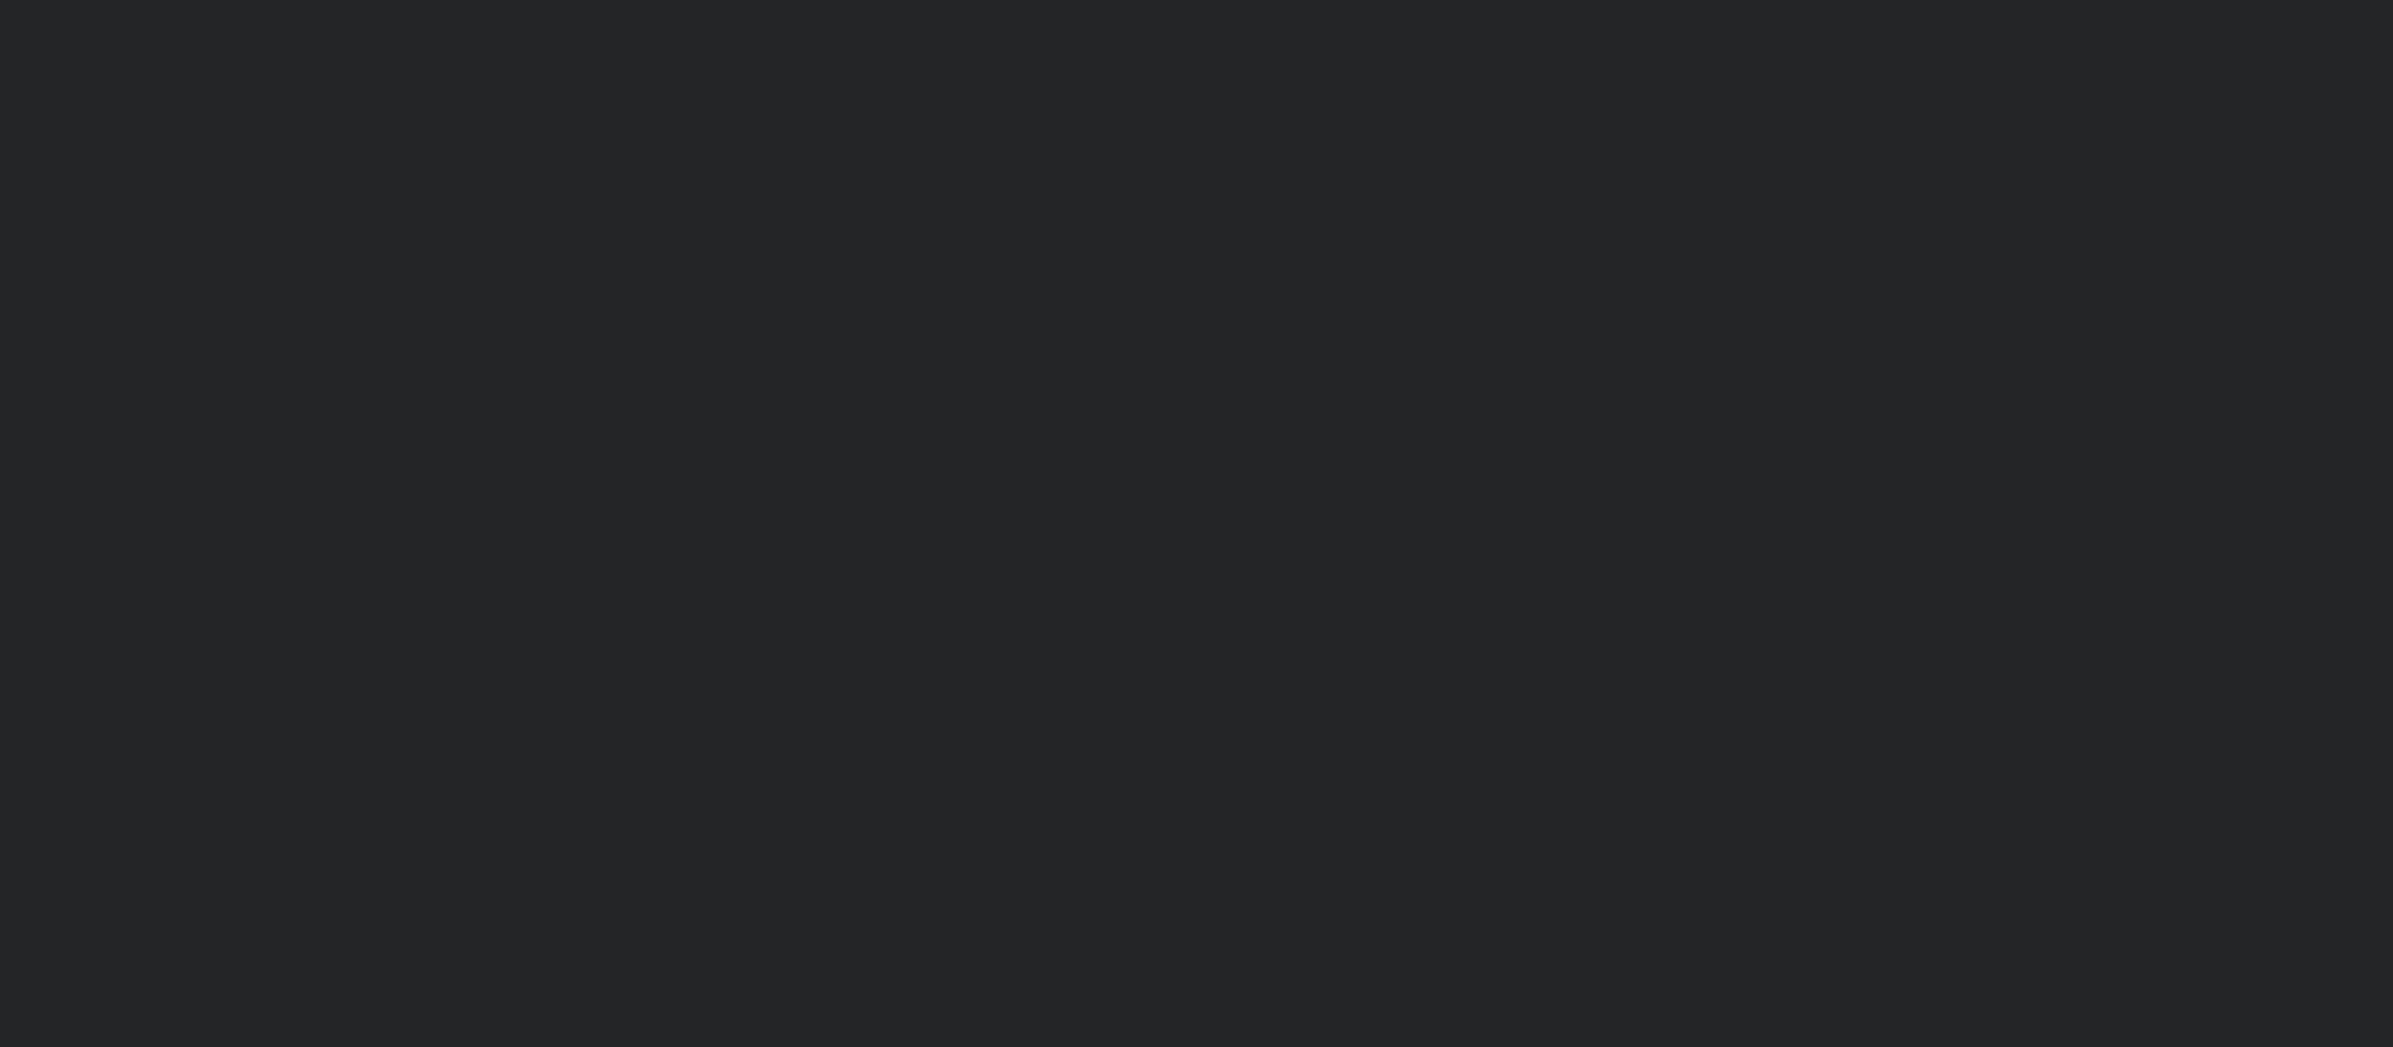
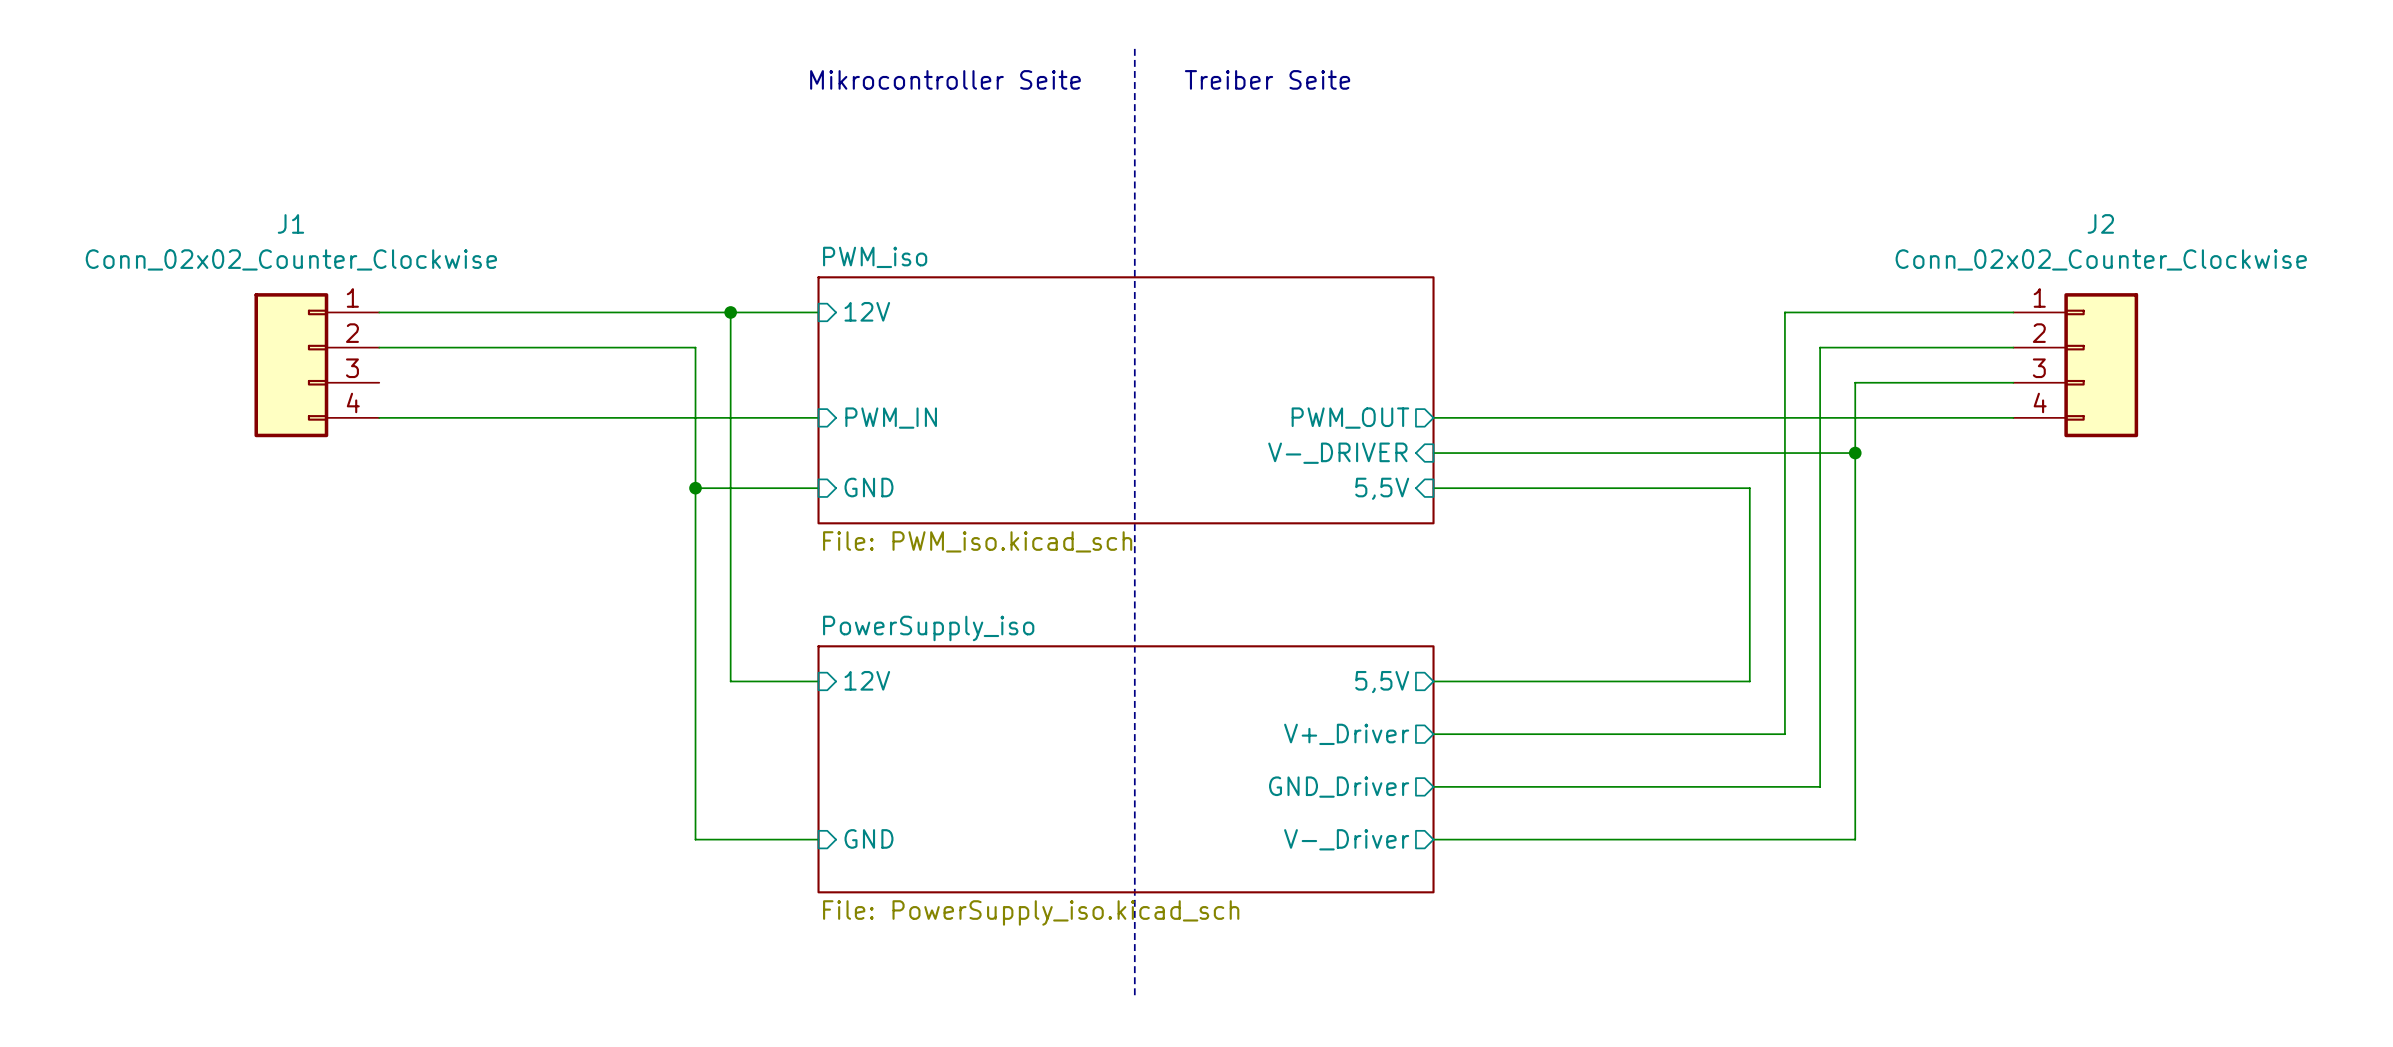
line: none -> (1134, 48) (1134, 997)
text: none -> Mikrocontroller Seite (945, 79)
text: none -> Treiber Seite (1267, 79)
sheet pin: none -> 12V (867, 311)
wire: none -> (379, 312) (818, 312)
wire: none -> (730, 312) (730, 681) (818, 681)
junction: none -> (730, 312)
wire: none -> (2013, 312) (1784, 312) (1784, 734) (1433, 734)
wire: none -> (379, 347) (695, 347) (695, 839) (818, 839)
wire: none -> (2013, 347) (1820, 347) (1820, 786) (1433, 786)
J1: none -> Conn_02x02_Counter_Clockwise (316, 365)
J2: none -> Conn_02x02_Counter_Clockwise (2075, 365)
wire: none -> (2013, 382) (1855, 382) (1855, 839) (1433, 839)
sheet PWM_iso: none -> File: PWM_iso.kicad_sch (1126, 400)
wire: none -> (379, 417) (818, 417)
sheet pin: none -> PWM_IN (891, 418)
sheet pin: none -> PWM_OUT (1350, 418)
wire: none -> (1433, 417) (2013, 417)
sheet pin: none -> V-_DRIVER (1337, 453)
wire: none -> (1433, 453) (1855, 453)
junction: none -> (1855, 453)
sheet pin: none -> GND (869, 487)
wire: none -> (695, 488) (818, 488)
junction: none -> (695, 488)
sheet pin: none -> 5,5V (1382, 488)
wire: none -> (1433, 488) (1749, 488) (1749, 681) (1433, 681)
sheet pin: none -> 12V (867, 680)
sheet pin: none -> 5,5V (1382, 682)
sheet pin: none -> V+_Driver (1346, 734)
sheet PowerSupply_iso: none -> File: PowerSupply_iso.kicad_sch (1126, 769)
sheet pin: none -> GND_Driver (1339, 787)
sheet pin: none -> GND (869, 838)
sheet pin: none -> V-_Driver (1346, 839)

